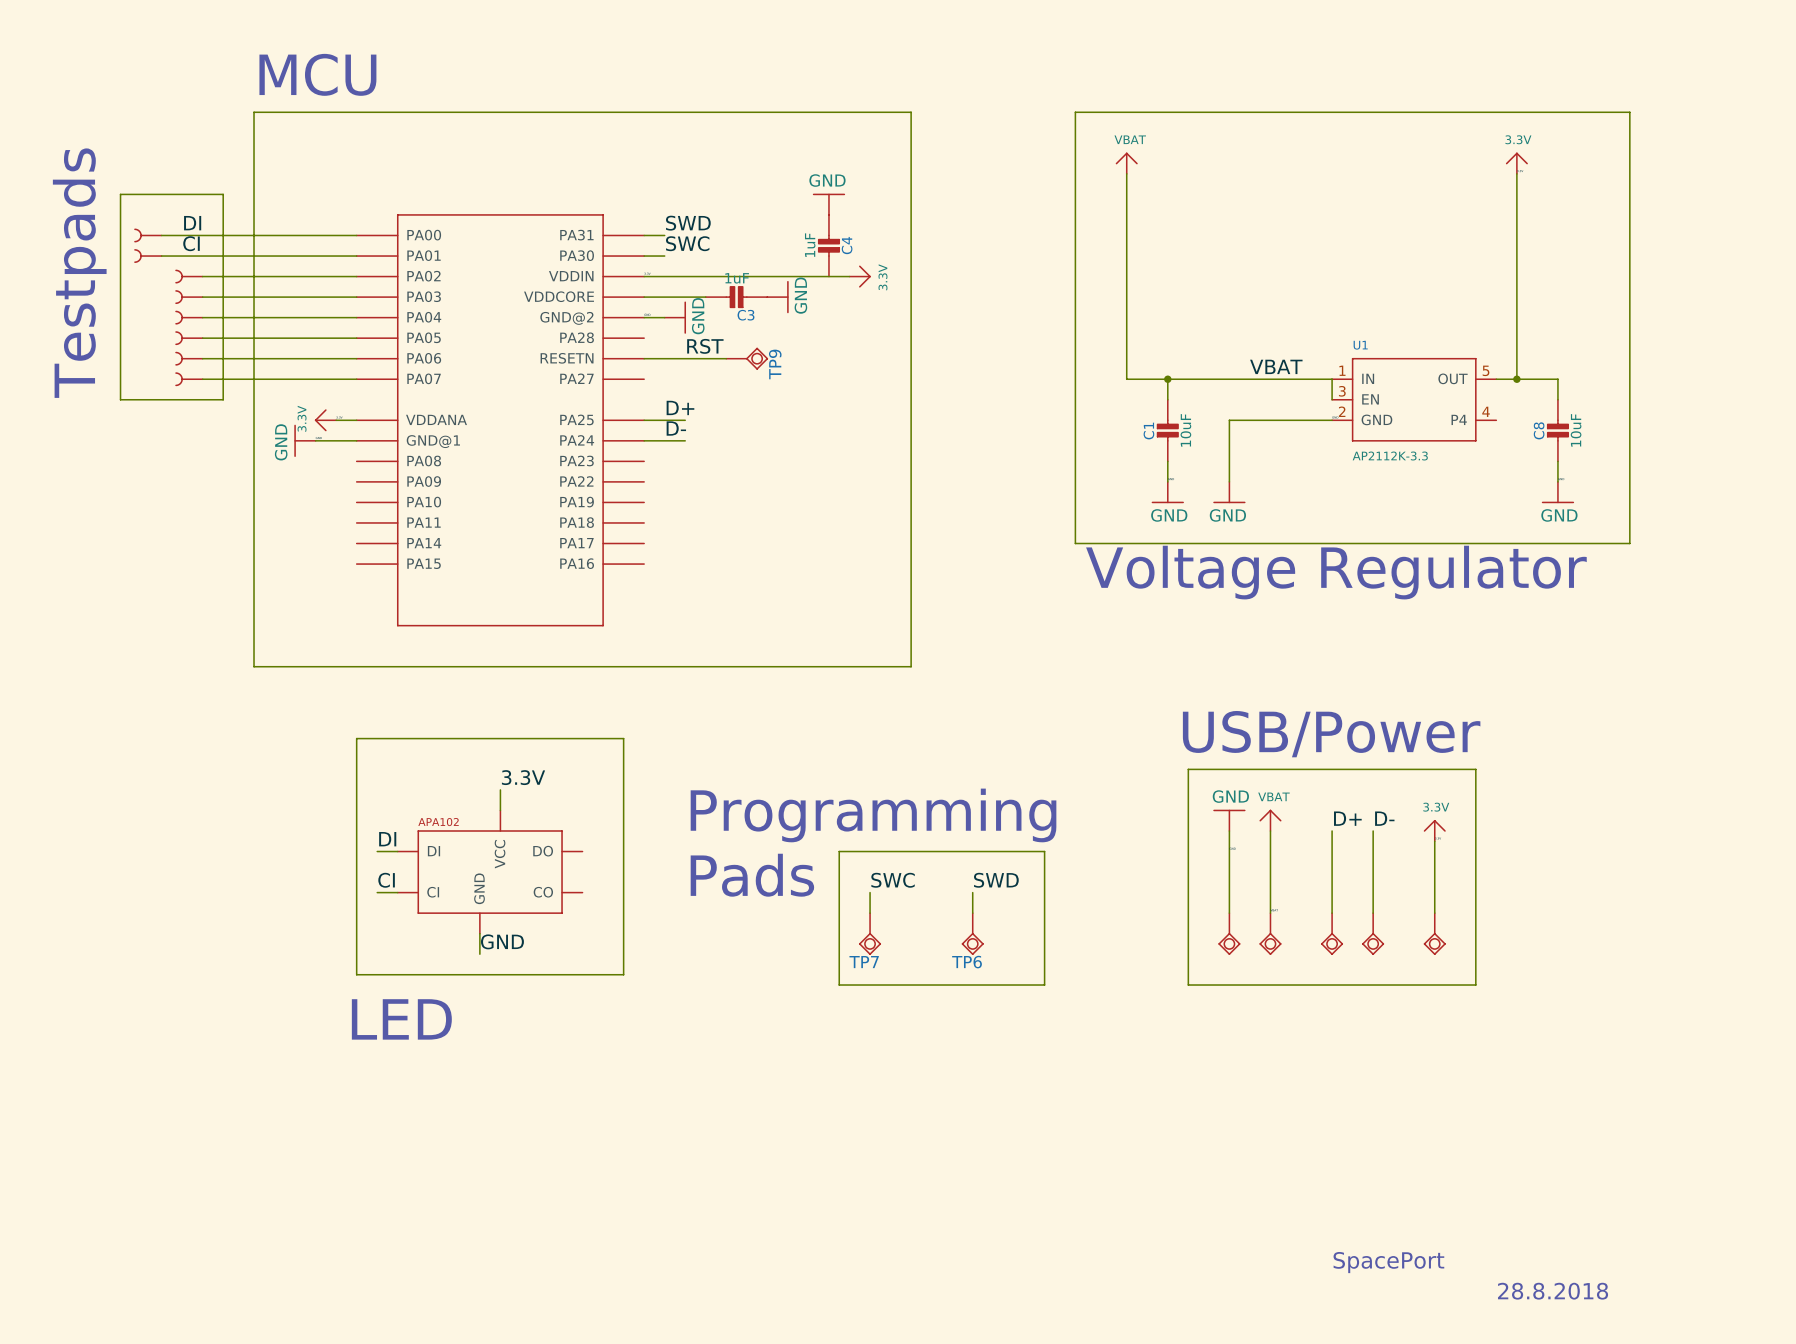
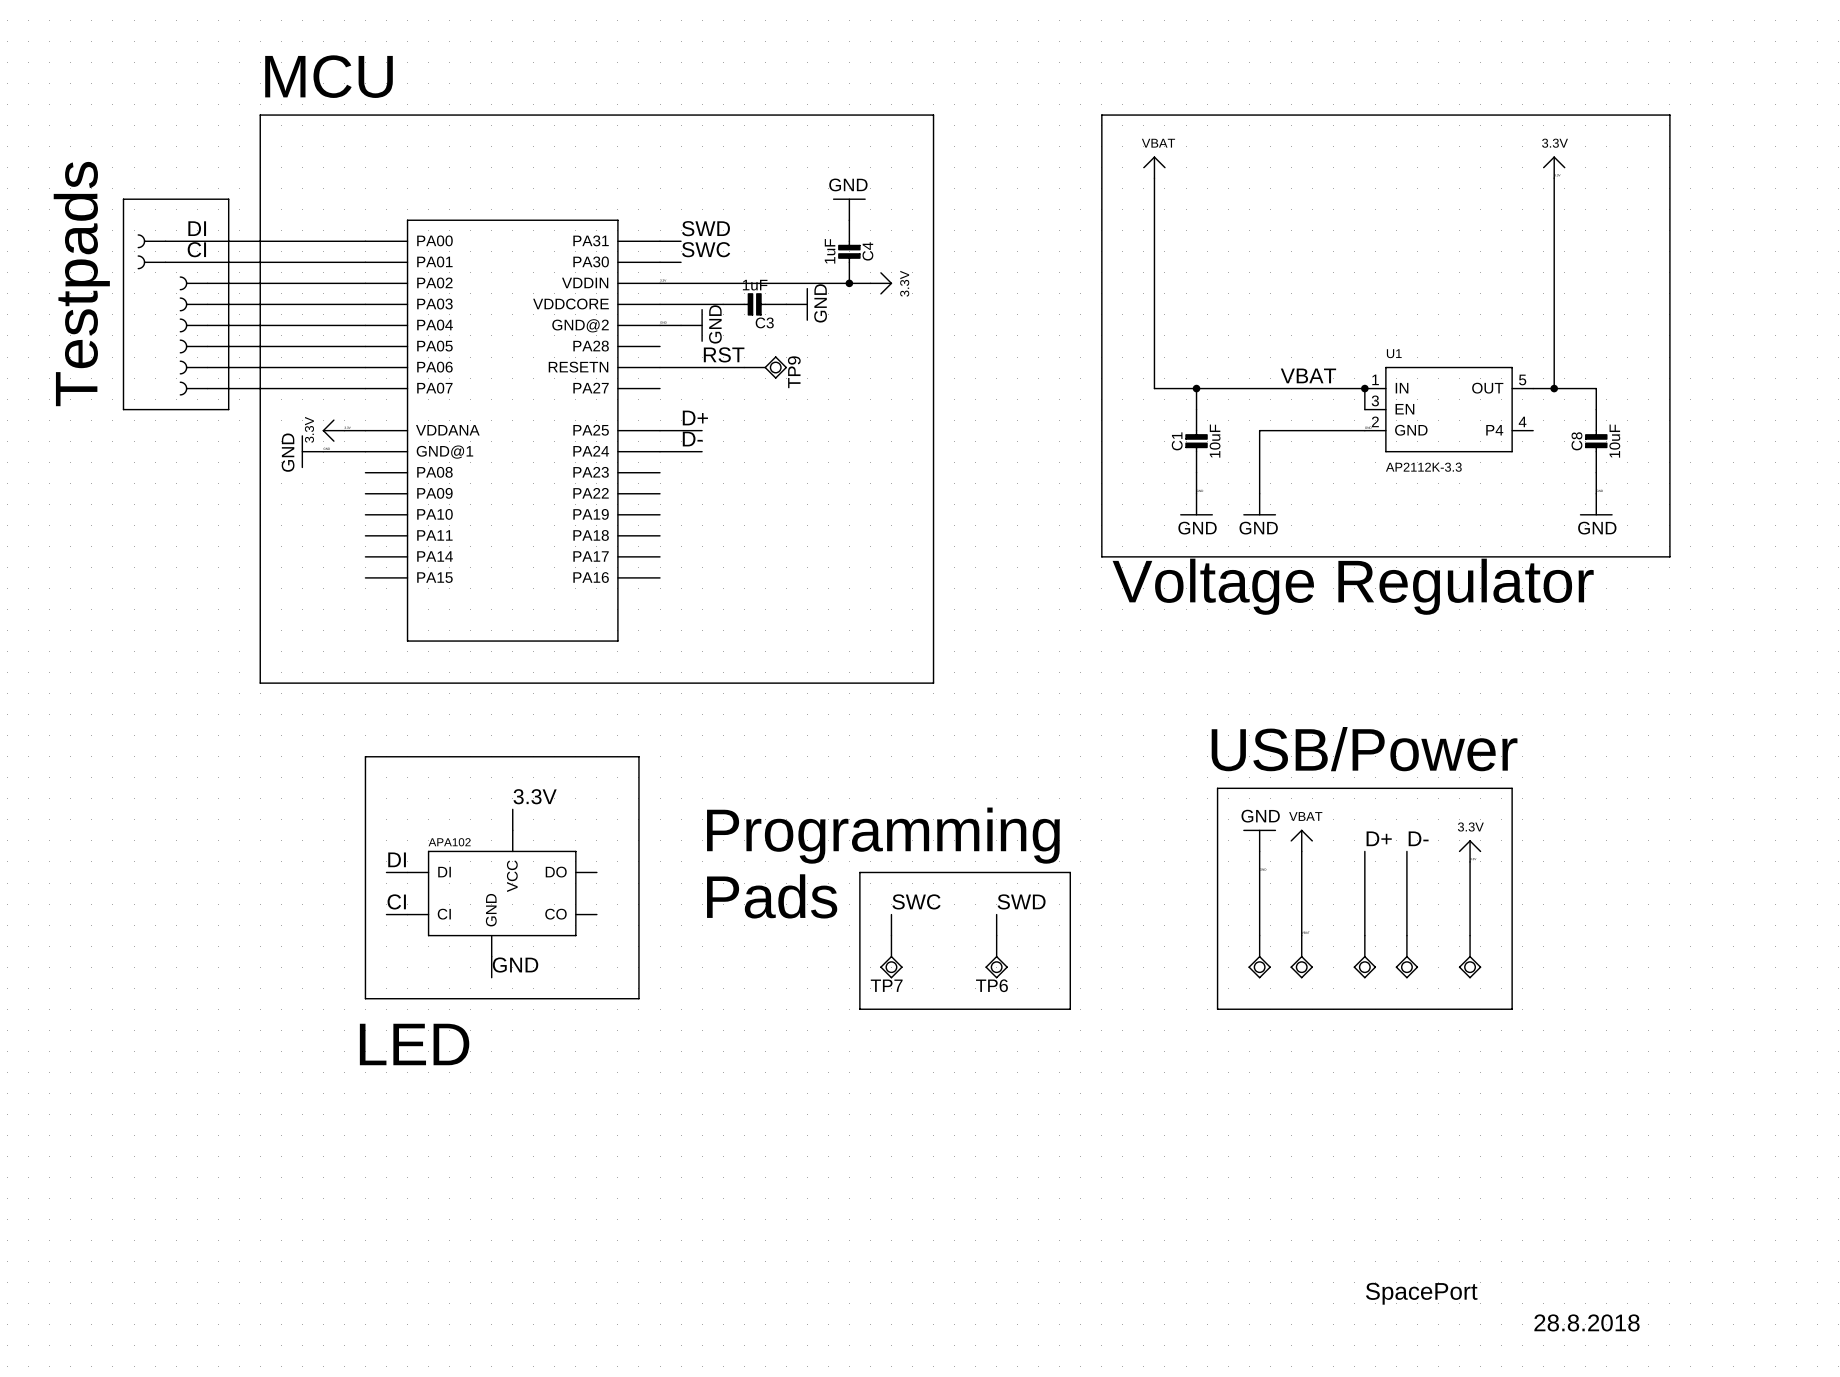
junction: none -> (849, 283)
junction: none -> (1364, 388)

